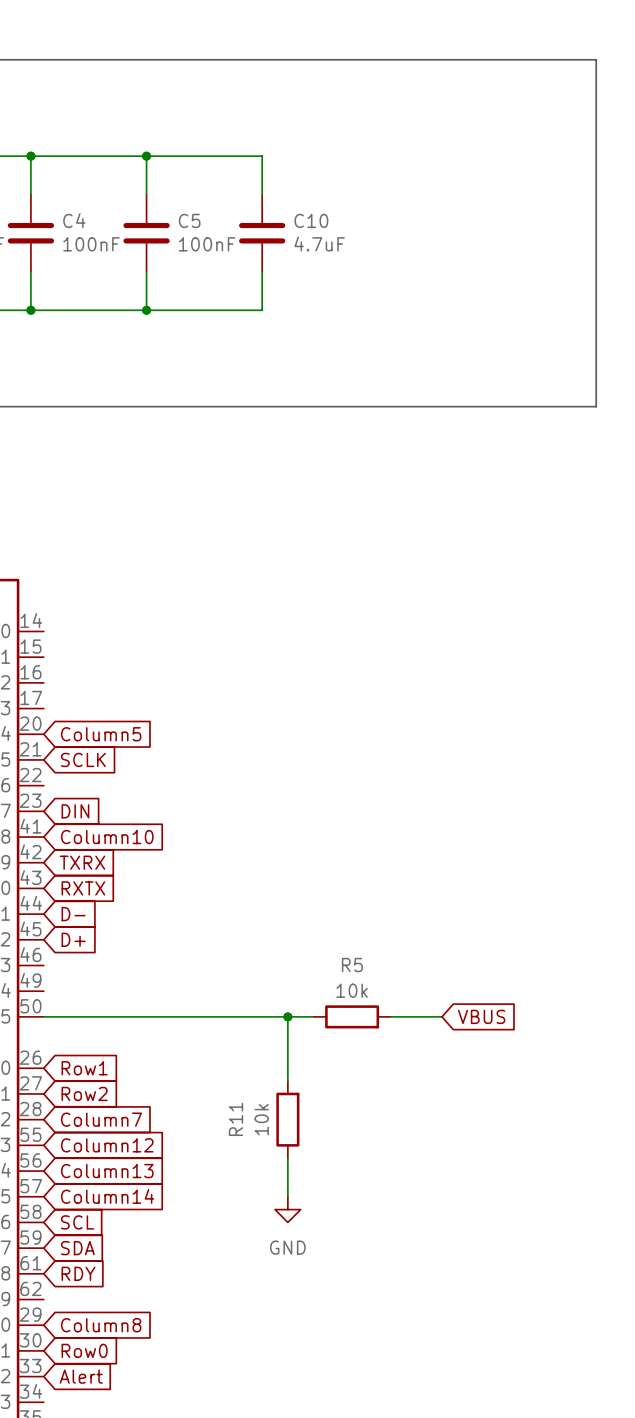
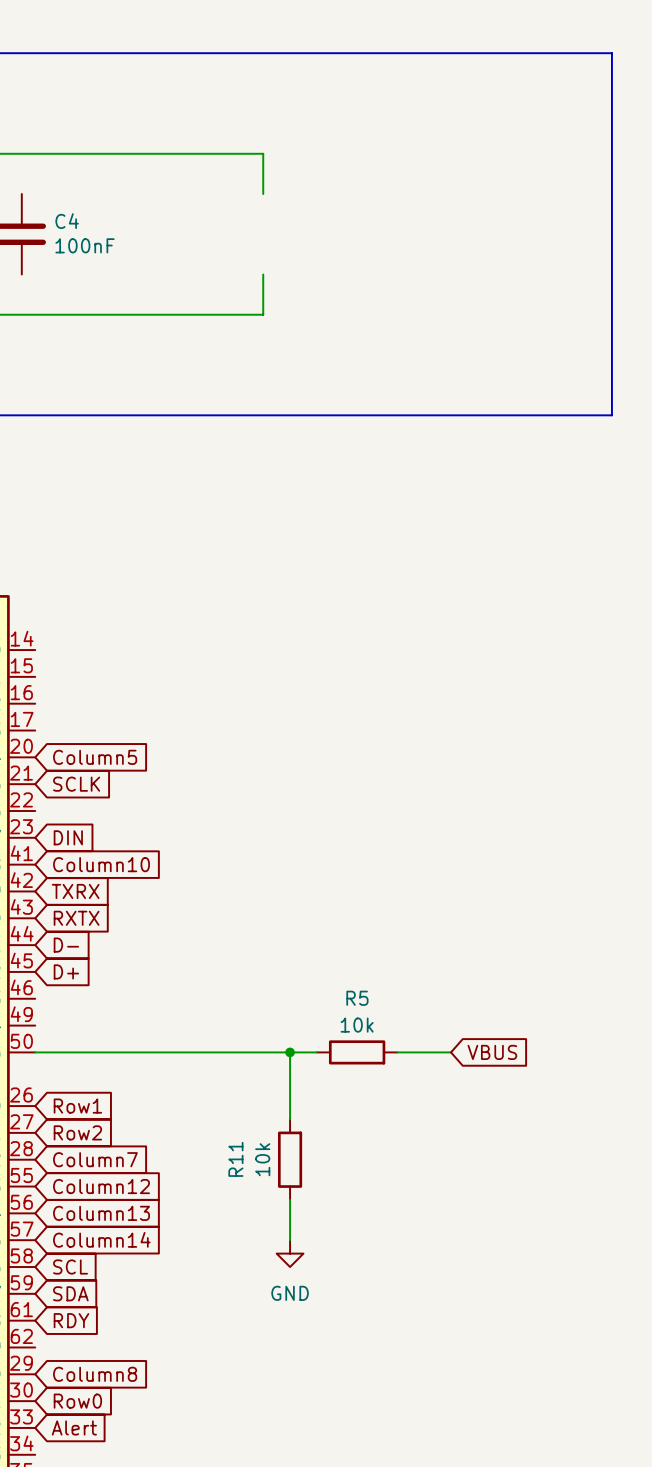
wire: (30, 156) (30, 194) -> none
junction: (30, 156) -> none
wire: (146, 156) (146, 194) -> none
junction: (146, 156) -> none
C5: 100nF (146, 233) -> none
C10: 4.7uF (262, 233) -> none
wire: (30, 271) (30, 310) -> none
wire: (146, 271) (146, 310) -> none
junction: (30, 310) -> none
junction: (146, 310) -> none

